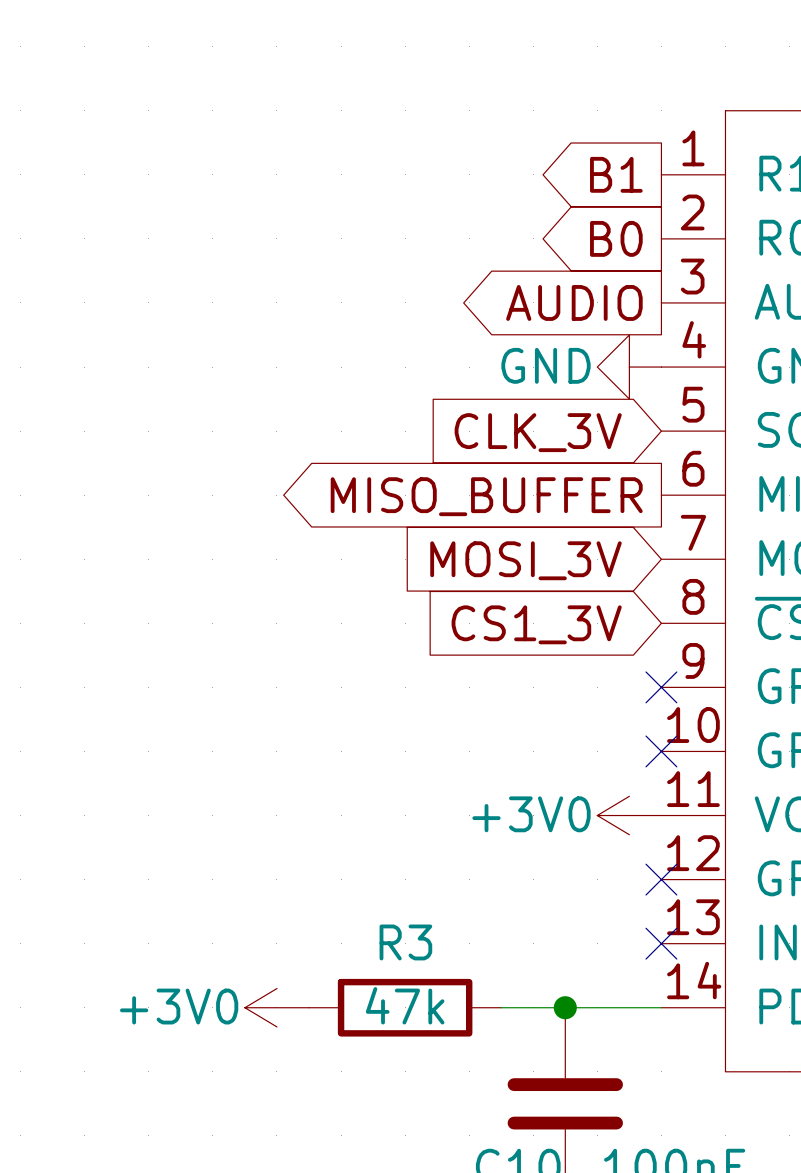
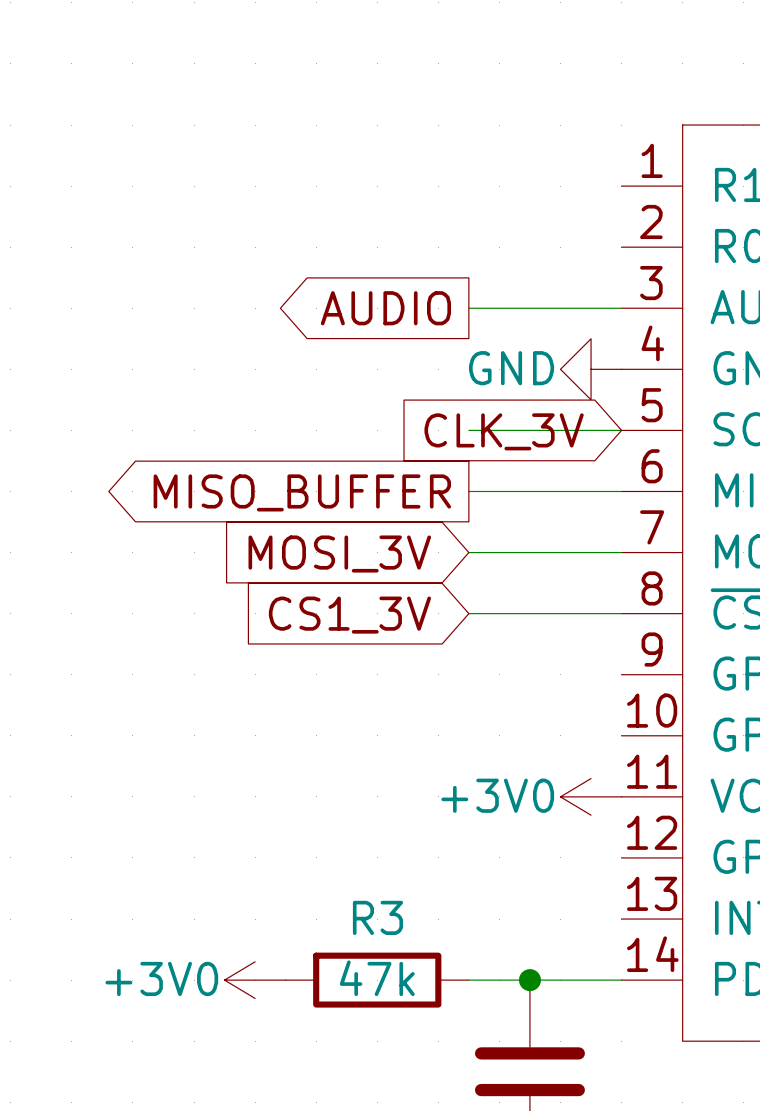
global label: B1 (616, 174) -> none
global label: B0 (616, 238) -> none
wire: none -> (468, 308) (621, 308)
global label position: AUDIO (574, 302) -> AUDIO (385, 308)
wire: none -> (468, 430) (621, 430)
wire: none -> (468, 491) (621, 491)
global label position: MISO_BUFFER (486, 496) -> MISO_BUFFER (302, 492)
wire: none -> (468, 552) (621, 552)
global label position: MOSI_3V (525, 560) -> MOSI_3V (339, 554)
wire: none -> (468, 613) (621, 613)
global label position: CS1_3V (536, 624) -> CS1_3V (349, 615)
no-connect mark: (661, 687) -> none
no-connect mark: (661, 751) -> none
no-connect mark: (661, 879) -> none
no-connect mark: (661, 943) -> none

